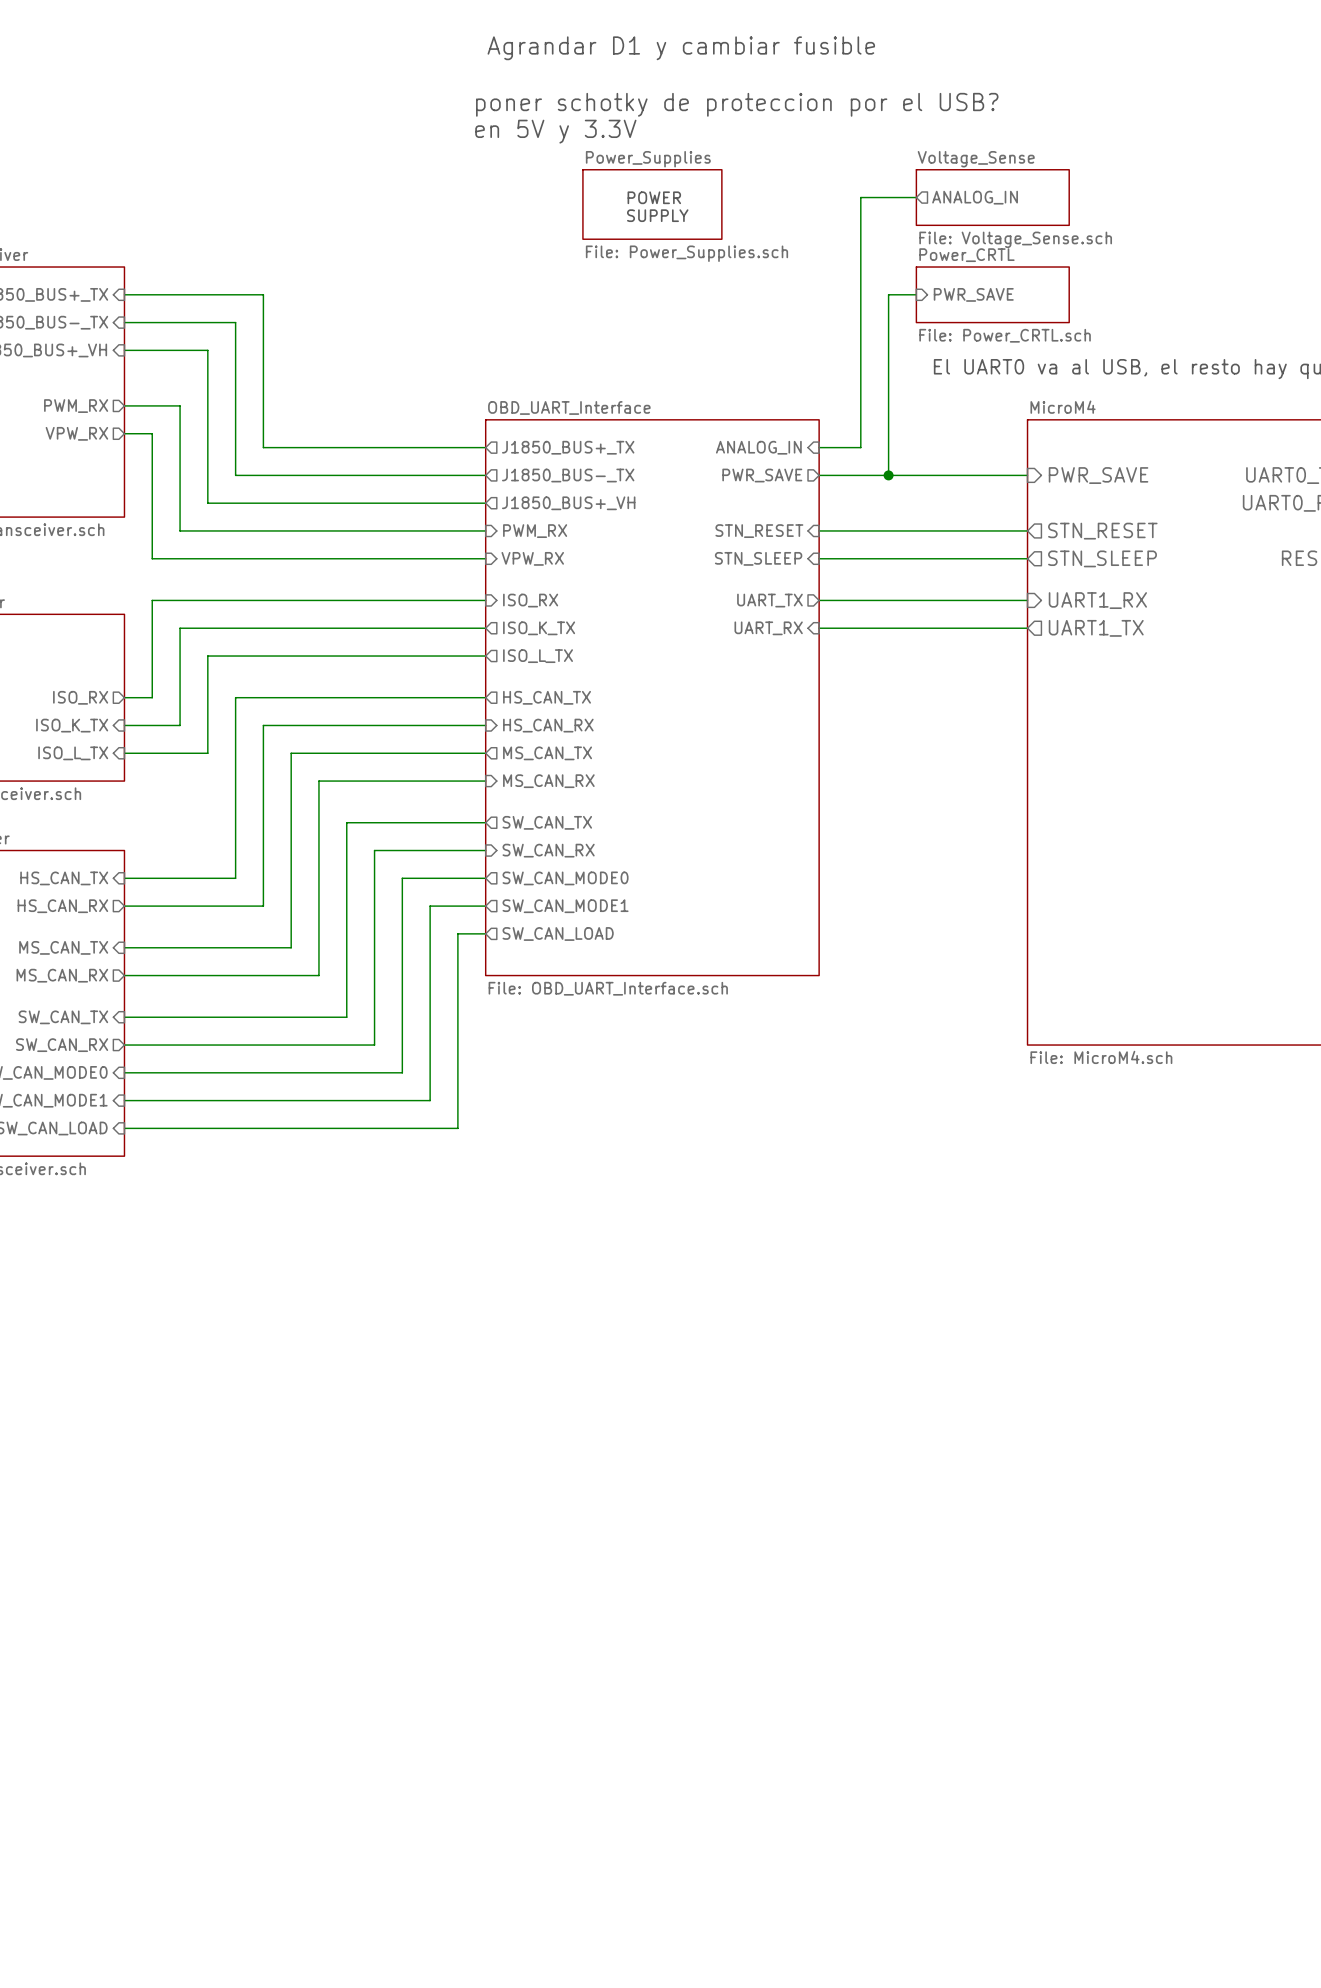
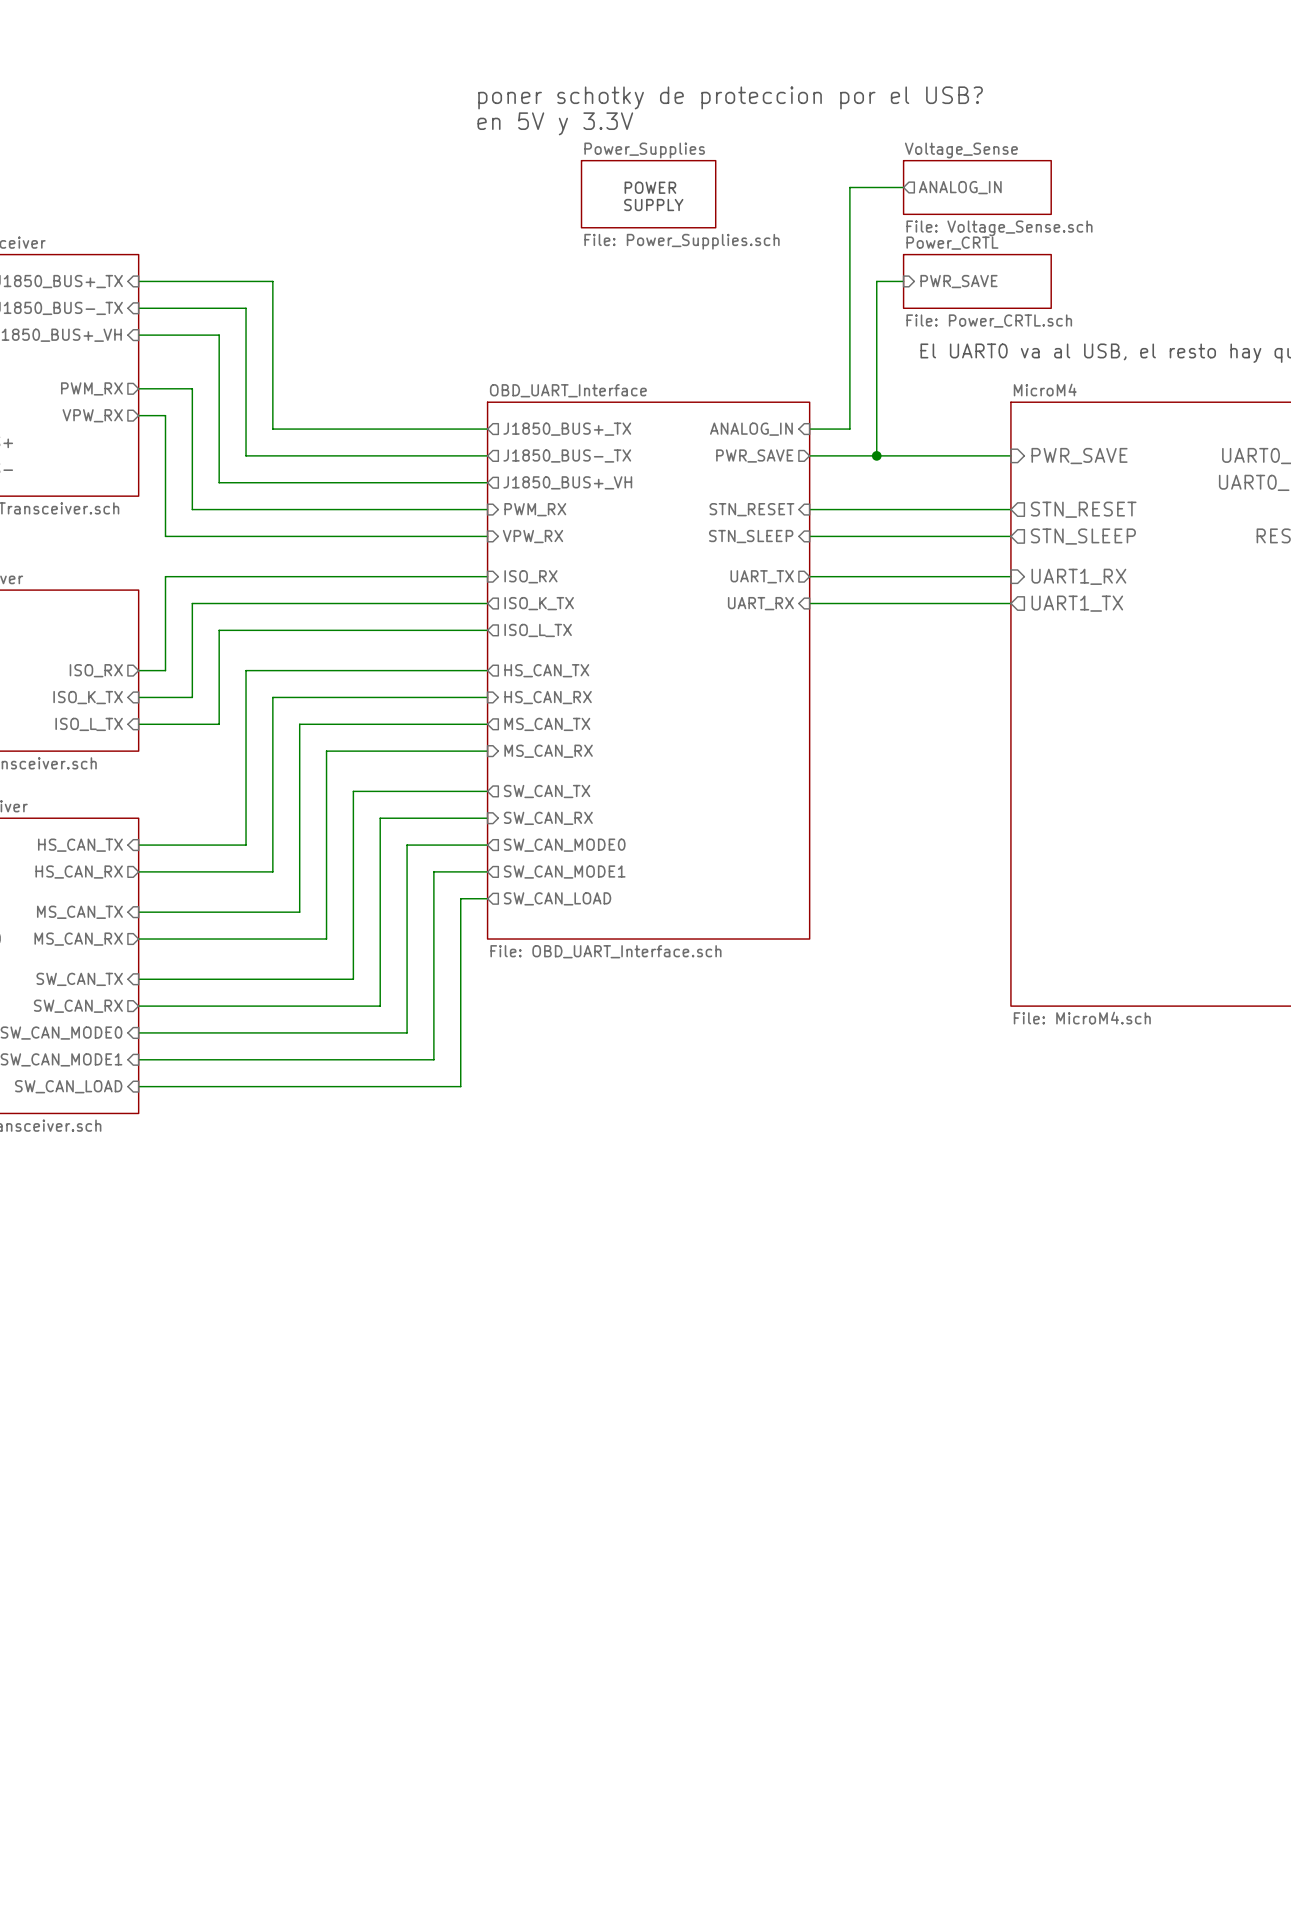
text: Agrandar D1 y cambiar fusible (681, 48) -> none

